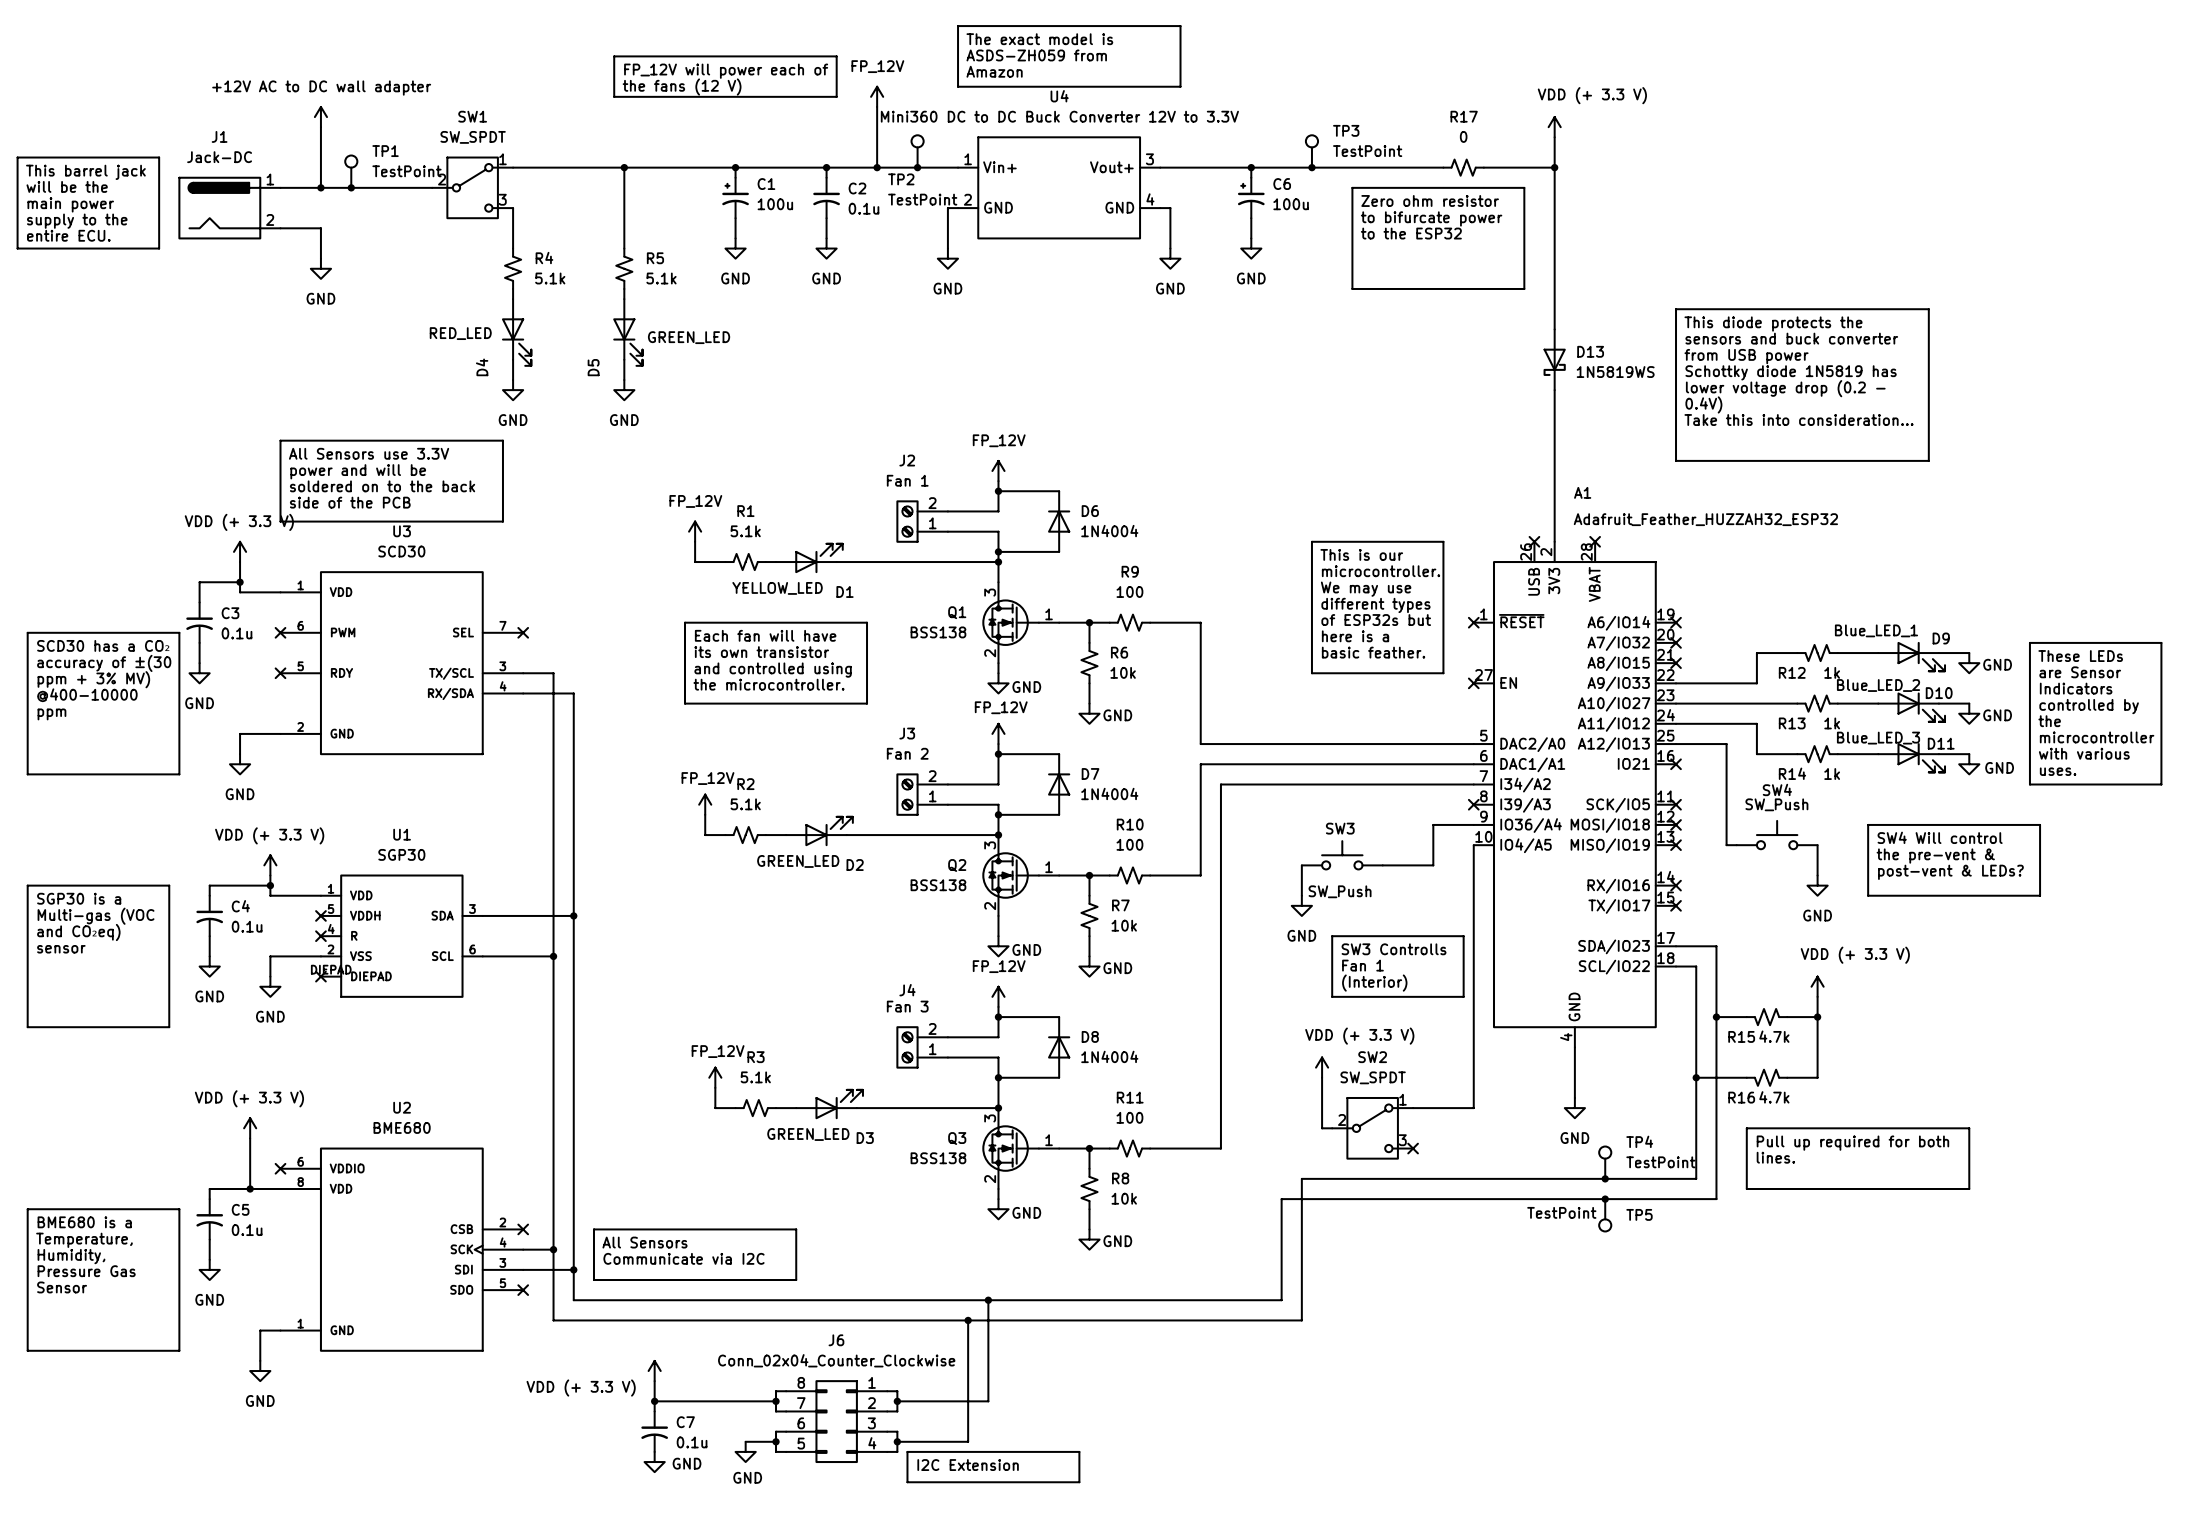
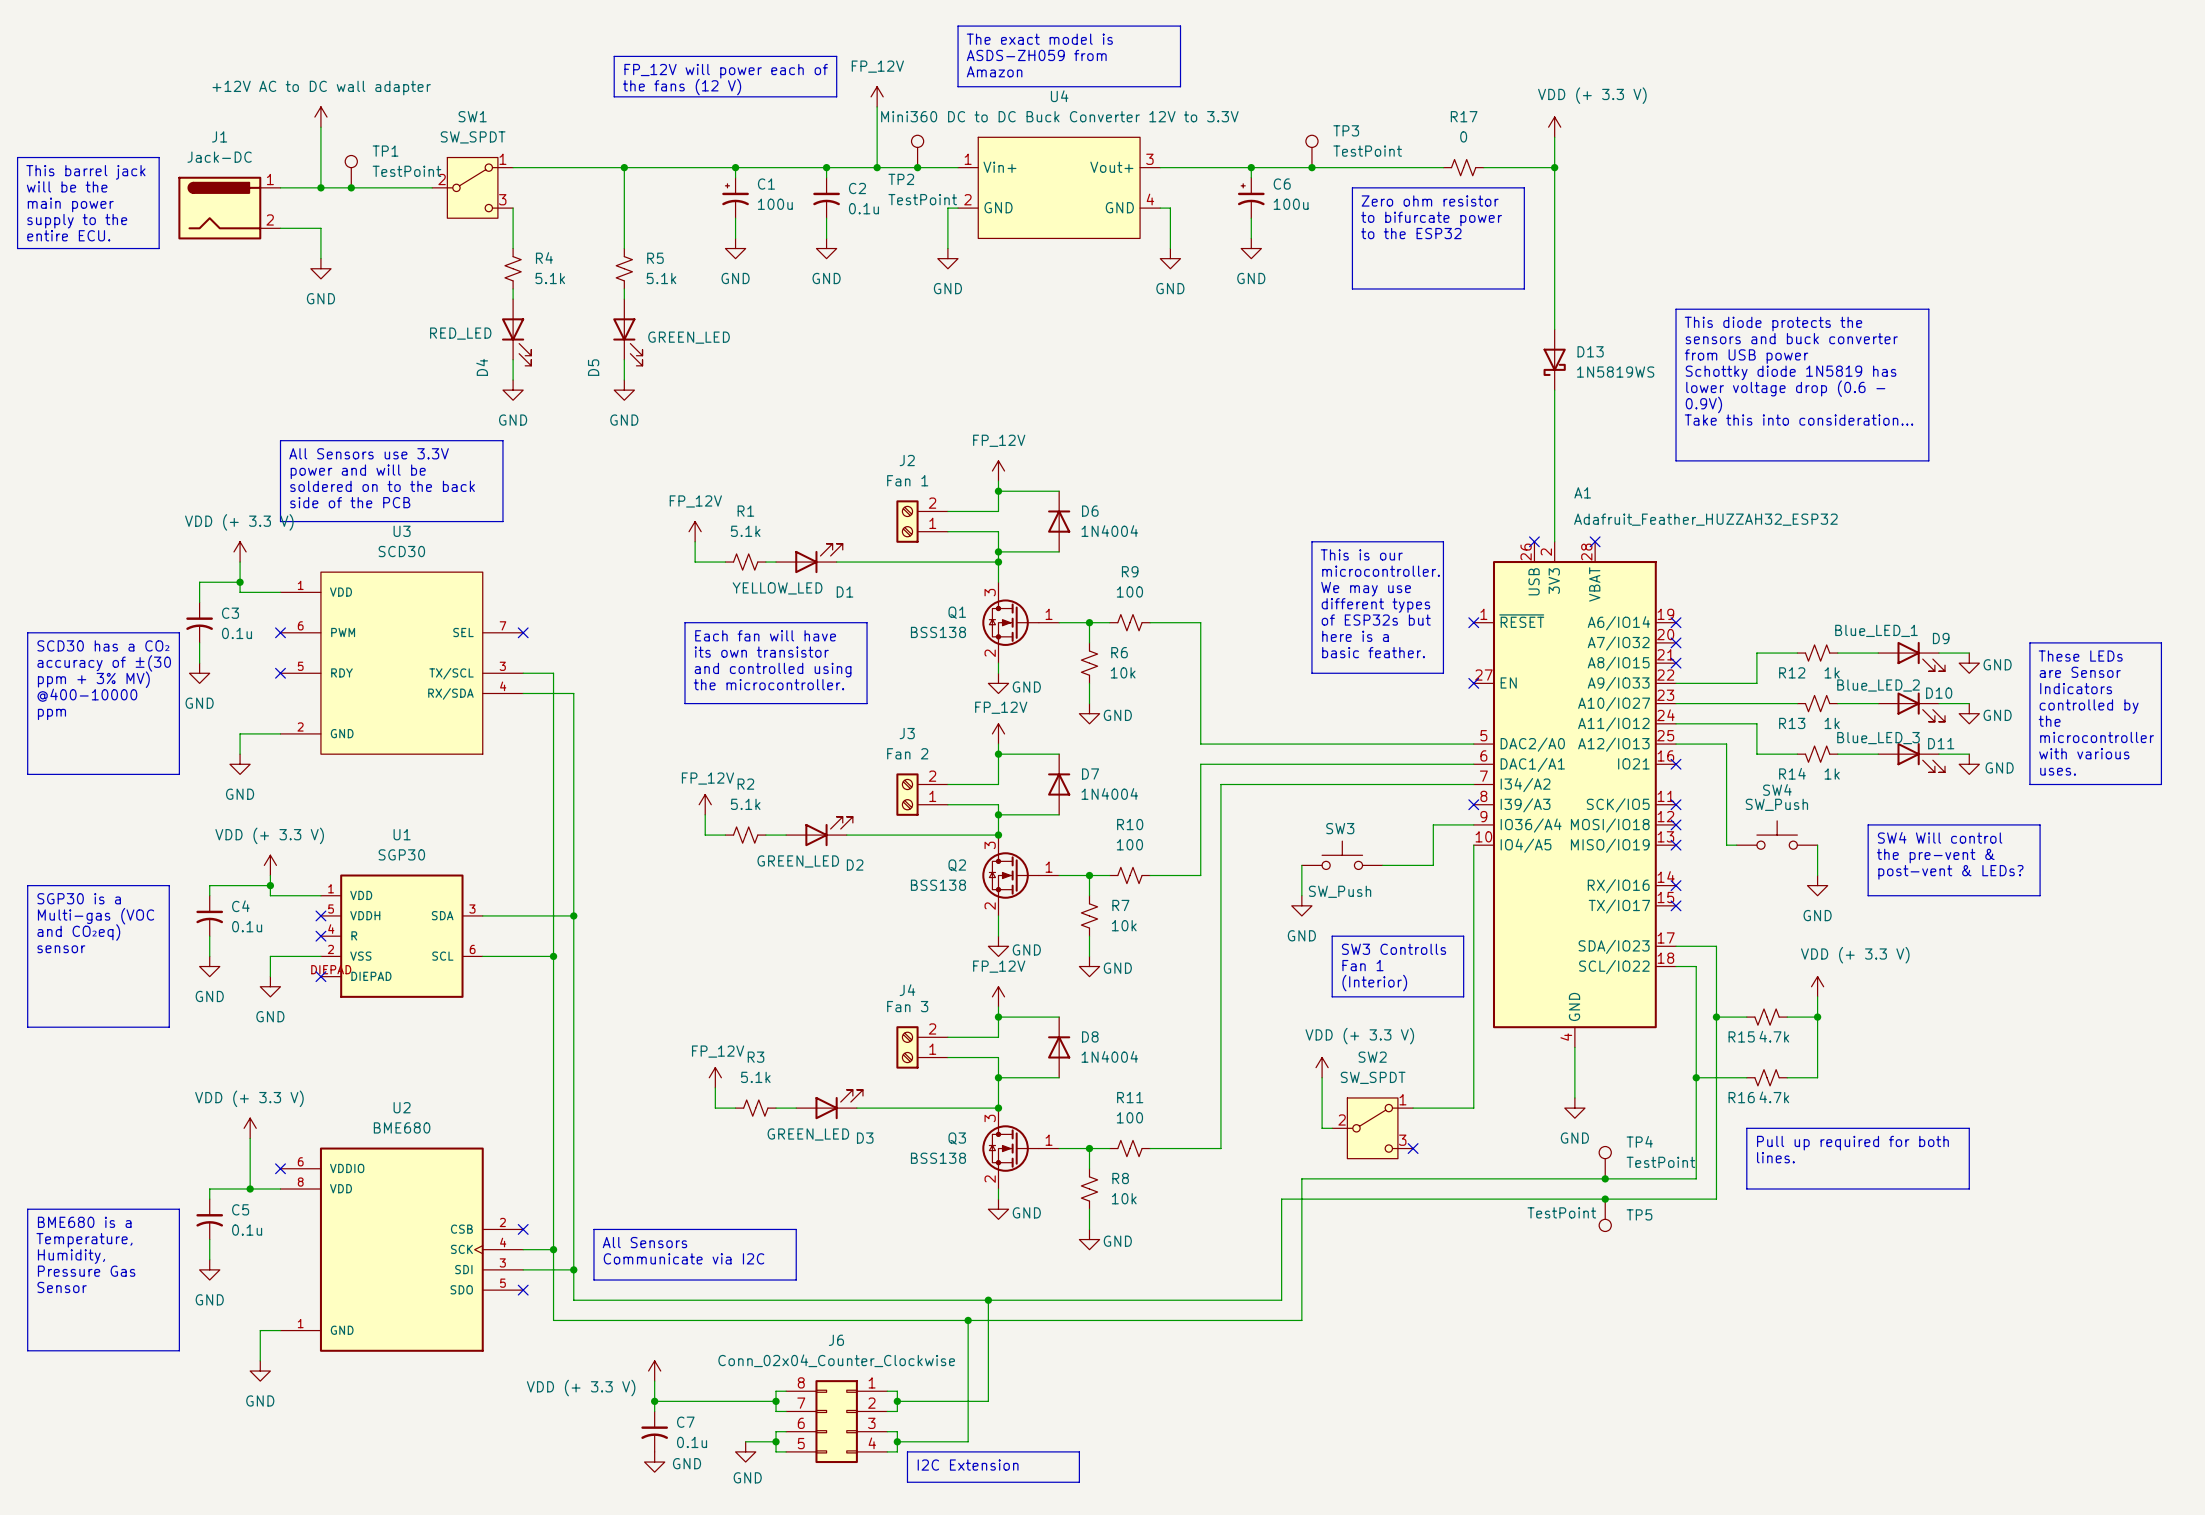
text: lower voltage drop (0.2 - (1785, 388) -> lower voltage drop (0.6 - (1785, 388)
text: 0.4V) (1703, 404) -> 0.9V) (1703, 404)

